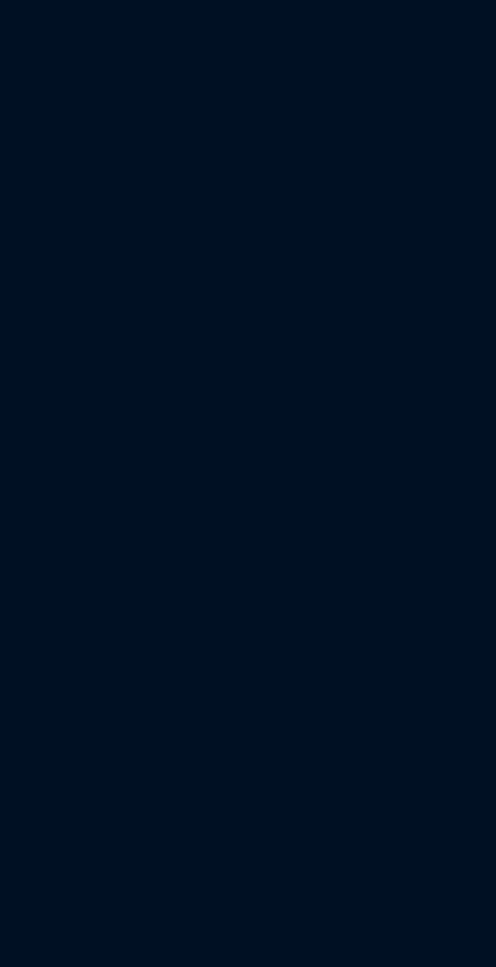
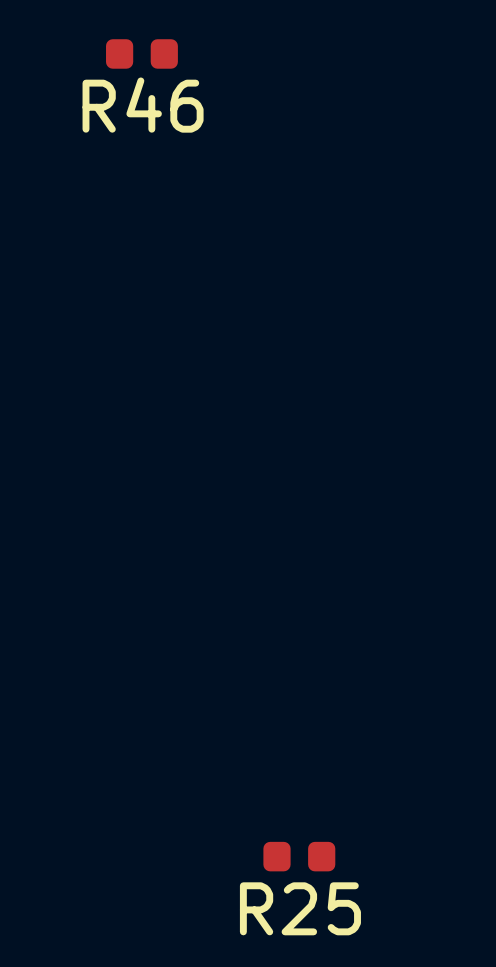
R46: none -> (141, 53)
R25: none -> (299, 856)

